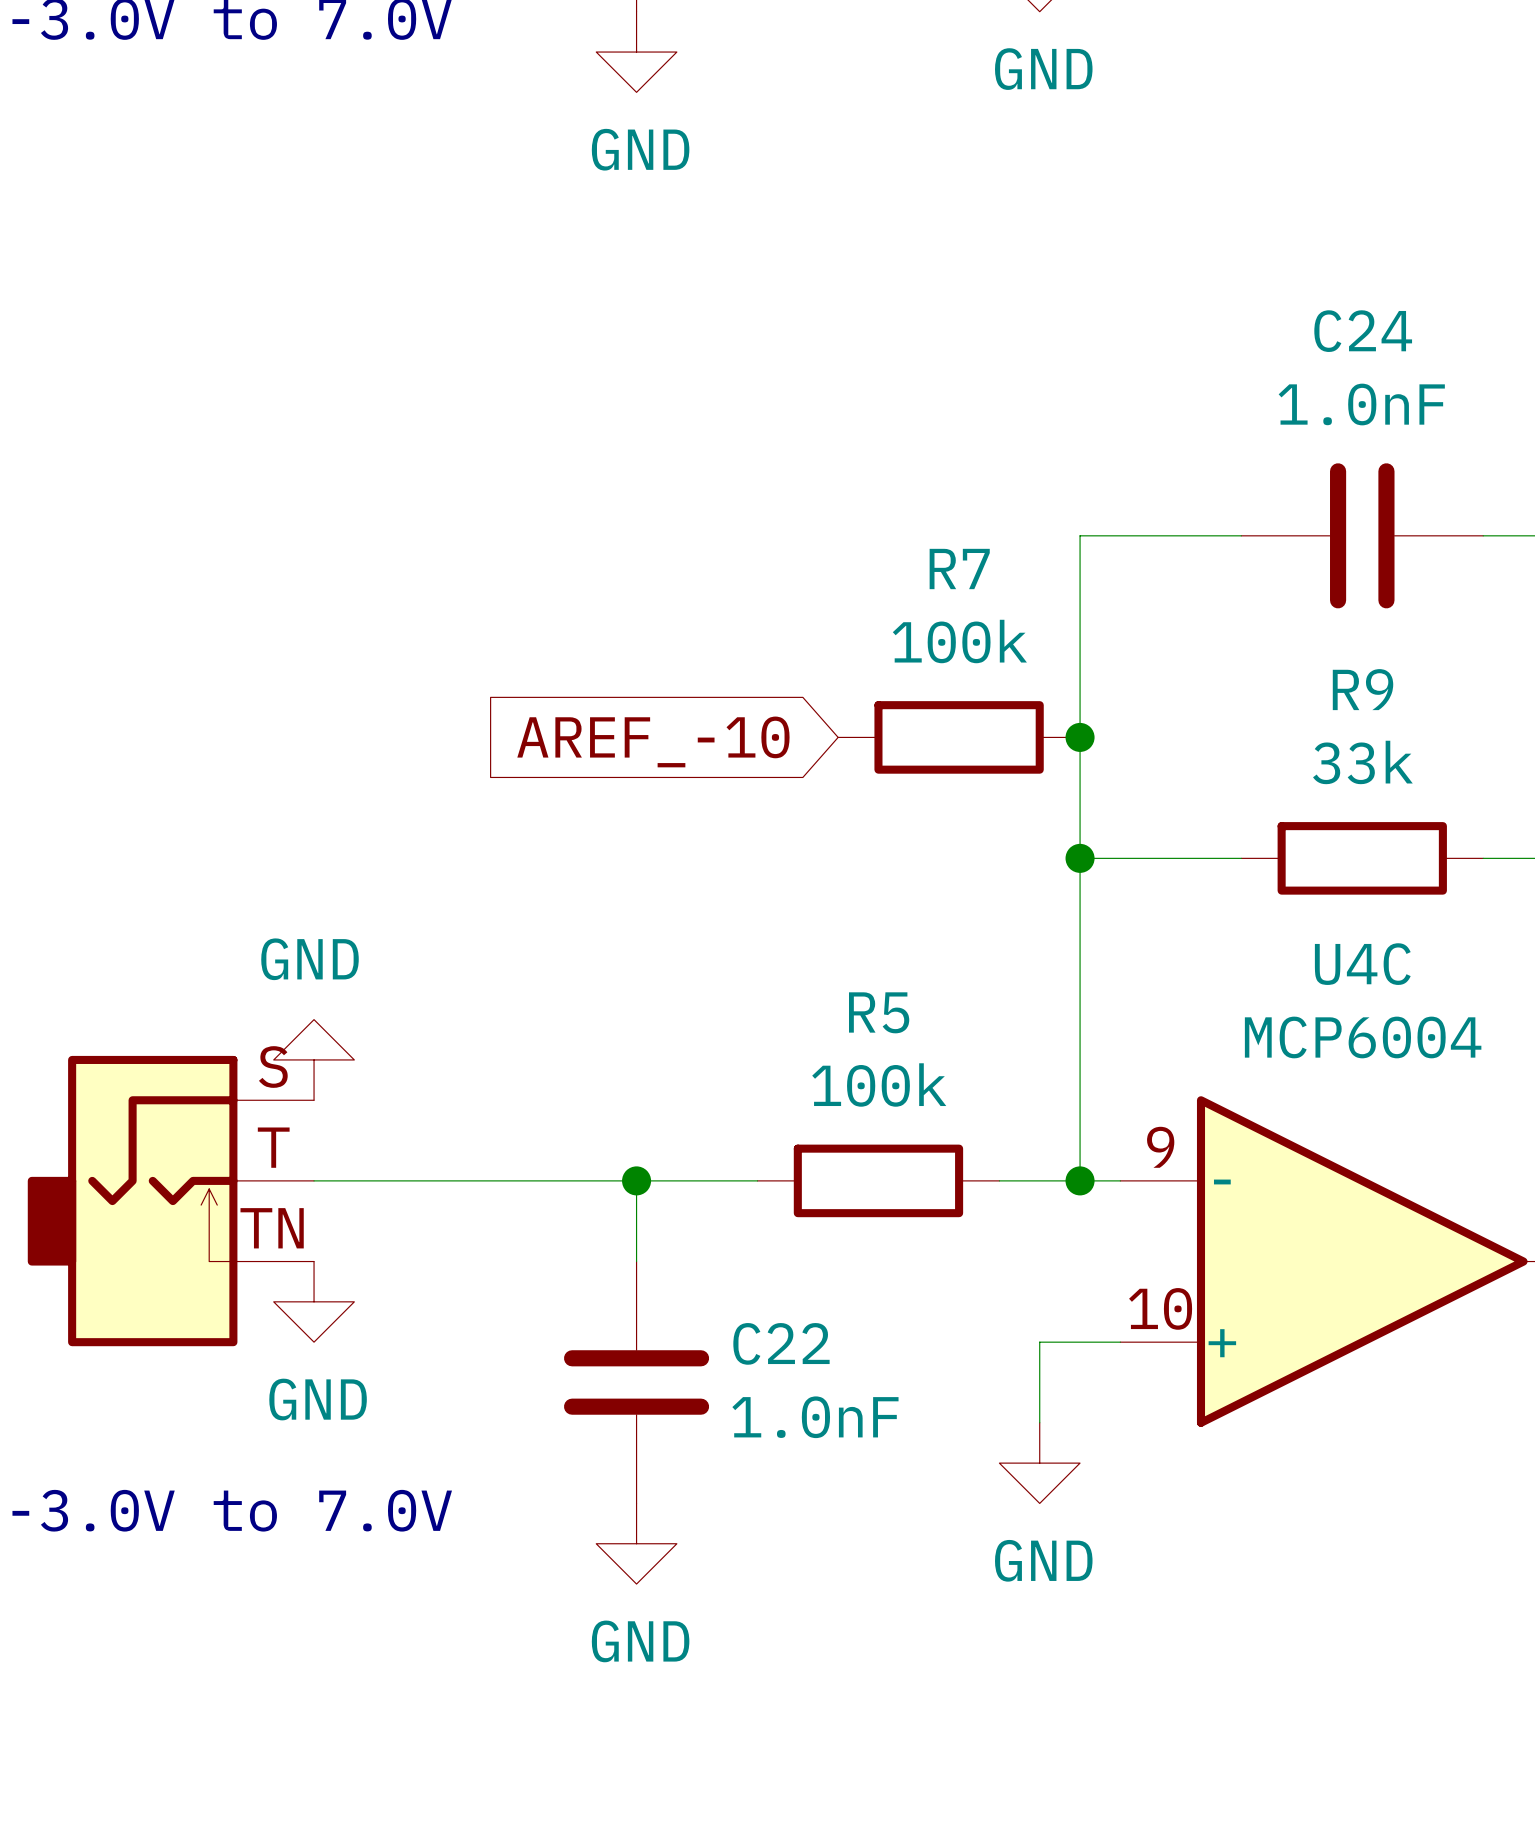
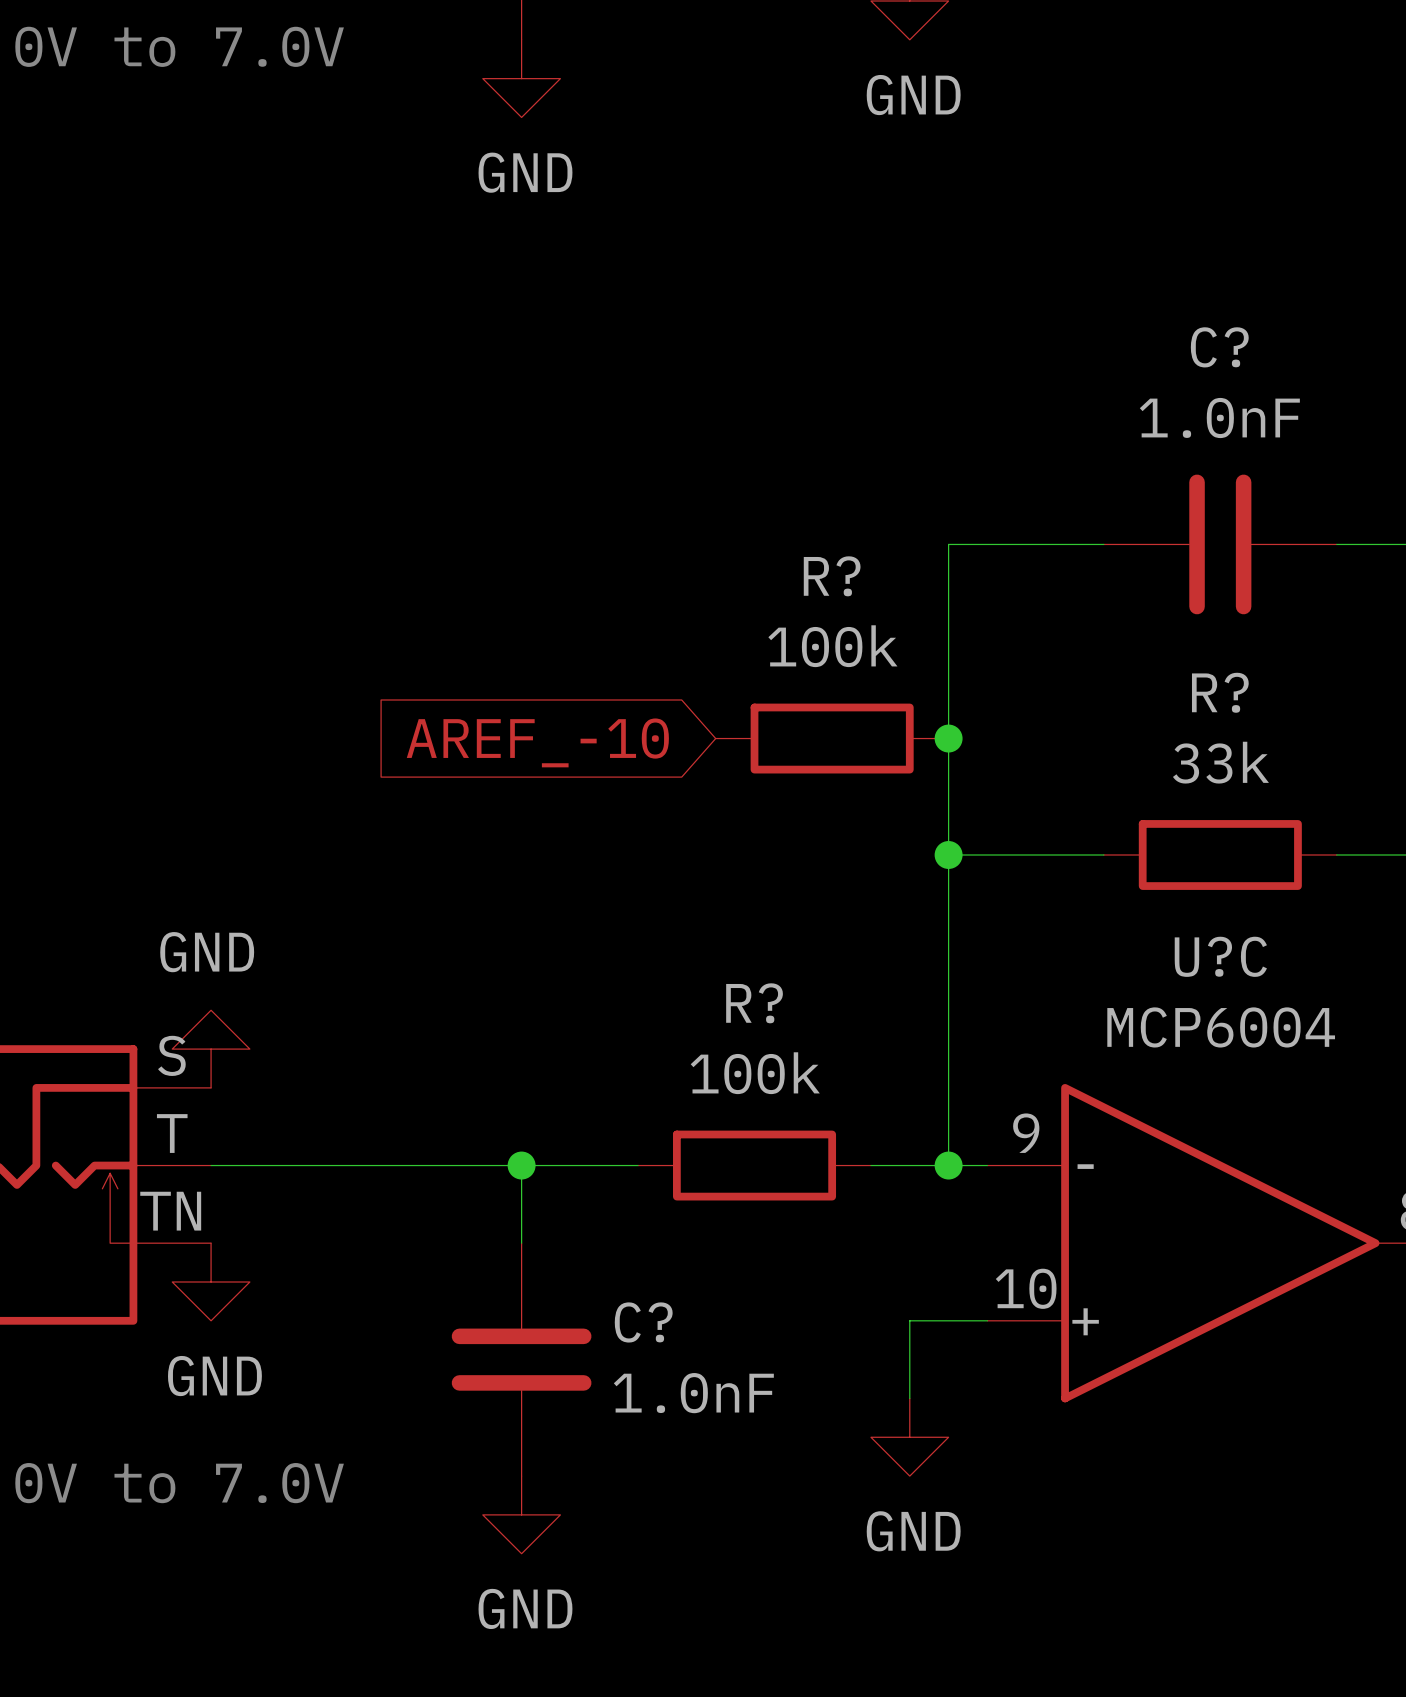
C24 name: C24 (1363, 331) -> C? (1219, 347)
R7 name: R7 (959, 569) -> R? (832, 576)
R9 name: R9 (1363, 689) -> R? (1220, 692)
U4C name: U4C (1362, 964) -> U?C (1220, 956)
R5 name: R5 (879, 1012) -> R? (754, 1003)
C22 name: C22 (781, 1343) -> C? (643, 1322)

